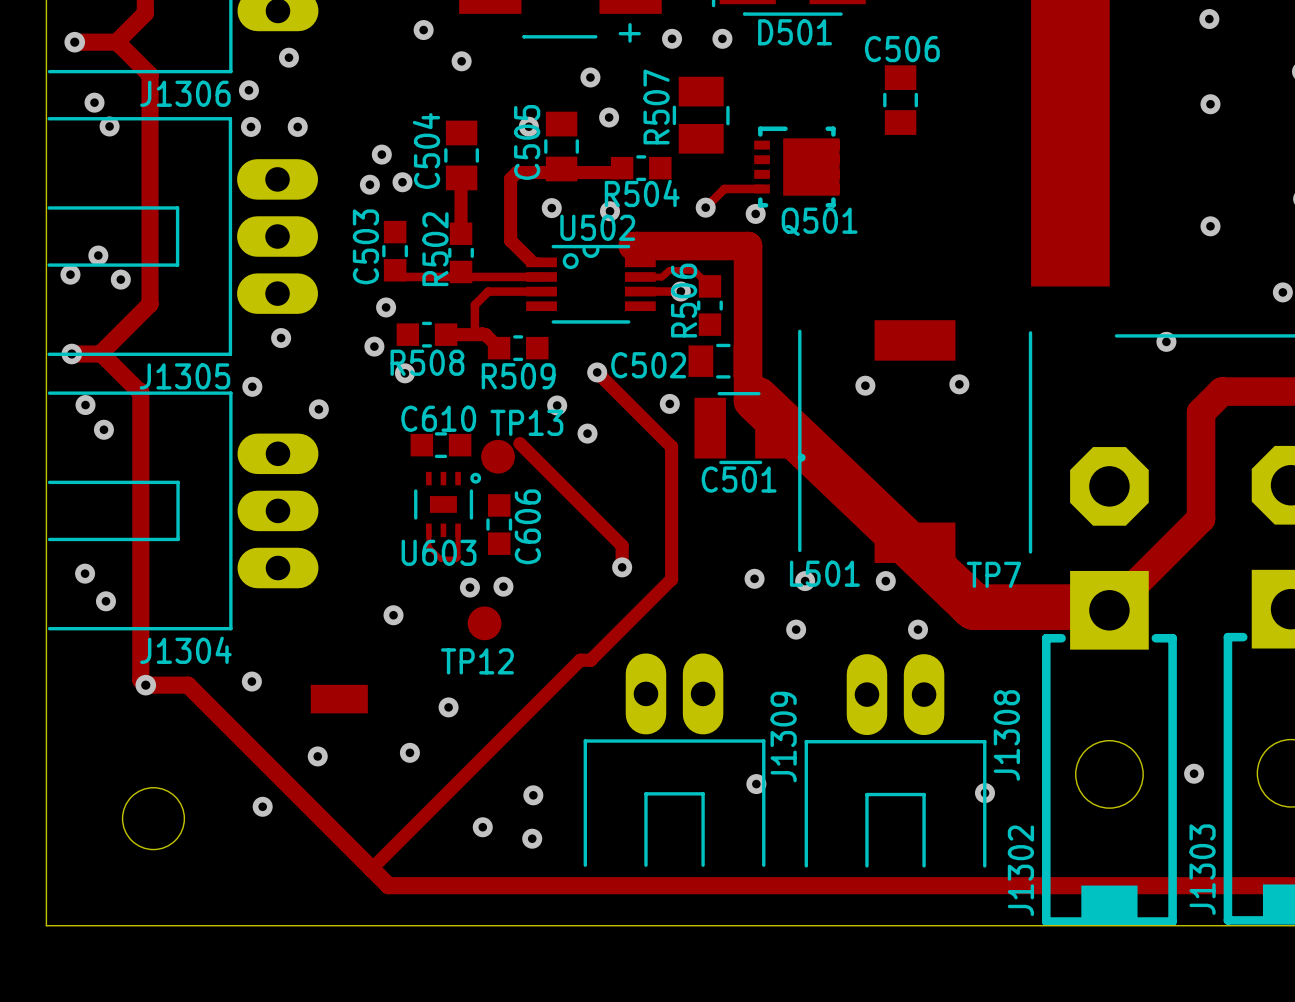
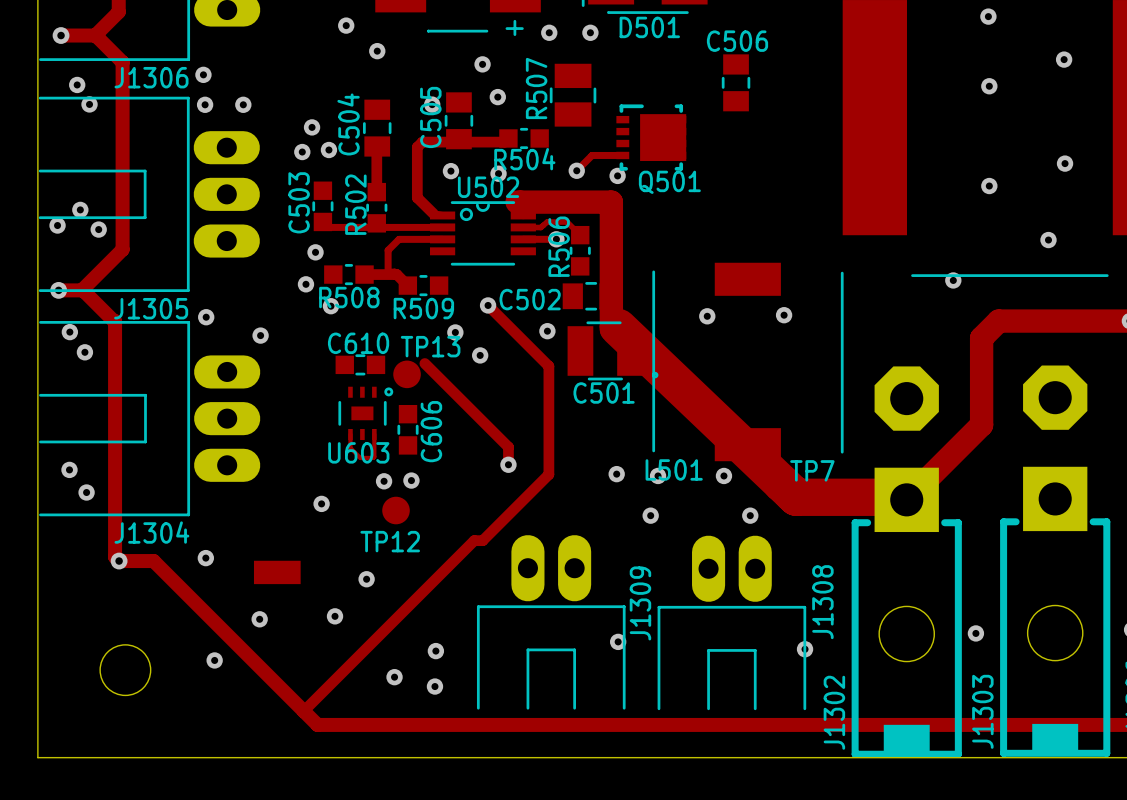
via: (288, 57) -> none
via: (281, 338) -> none

